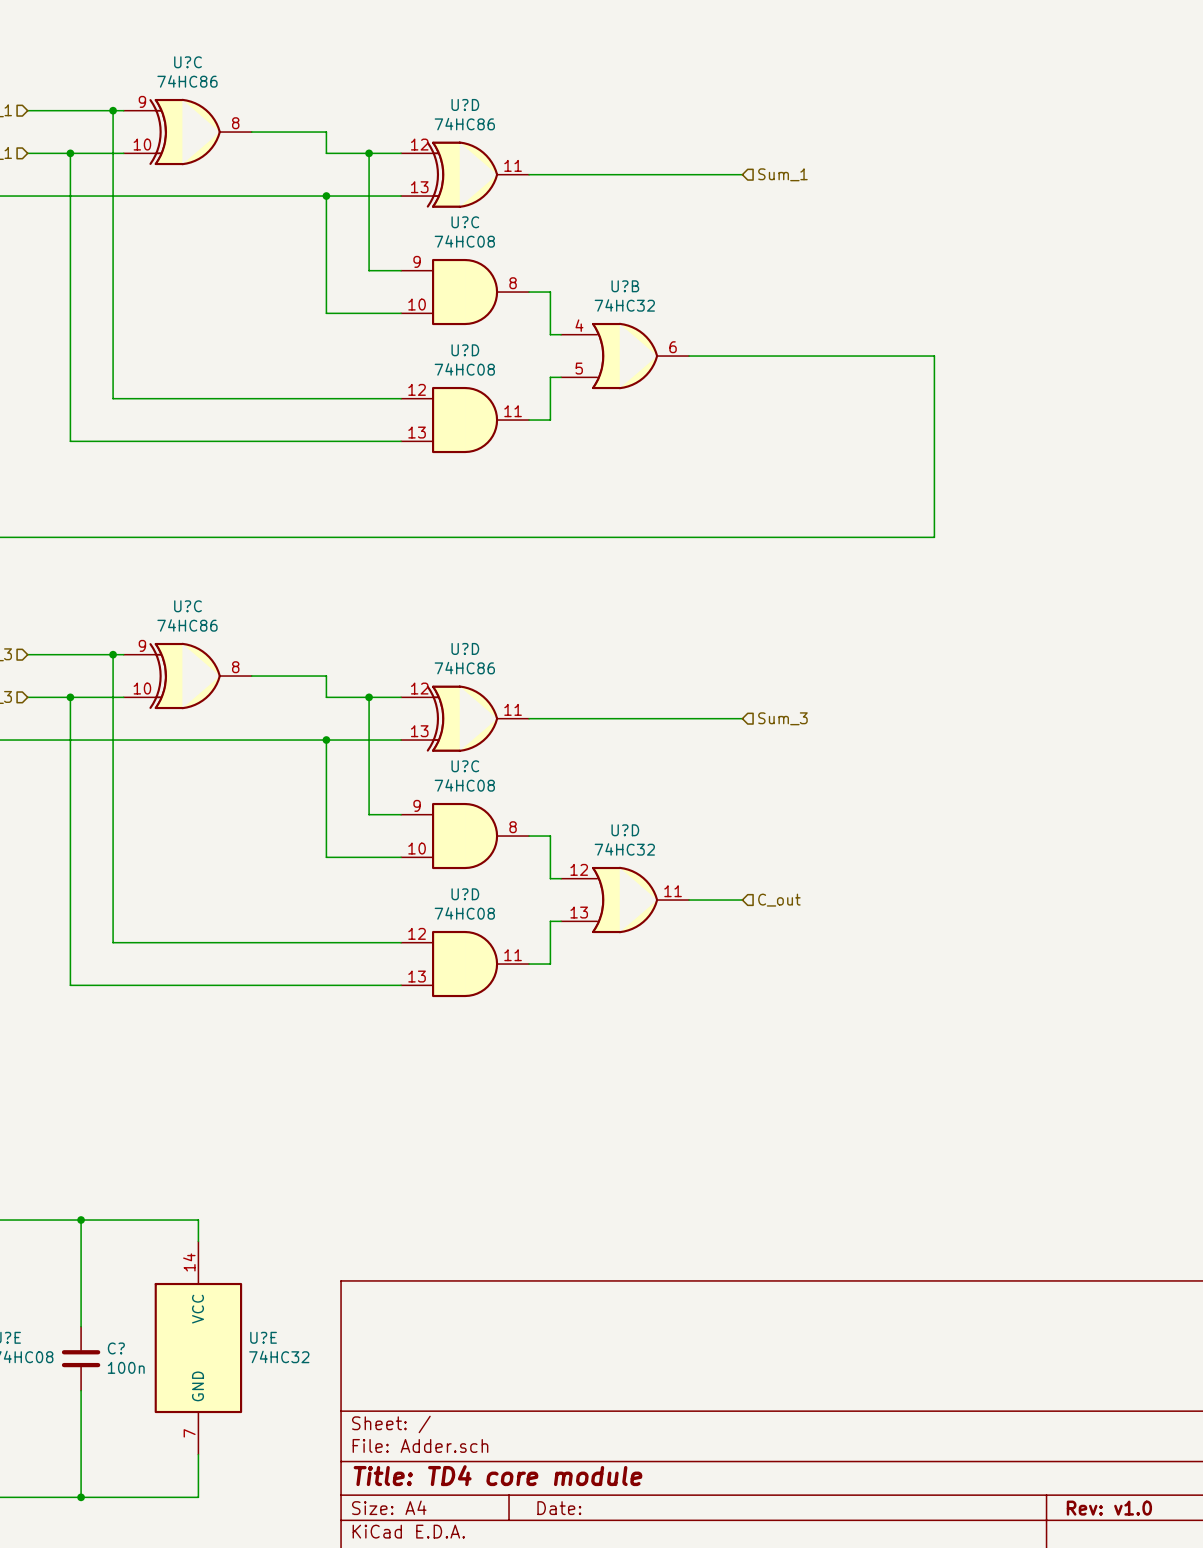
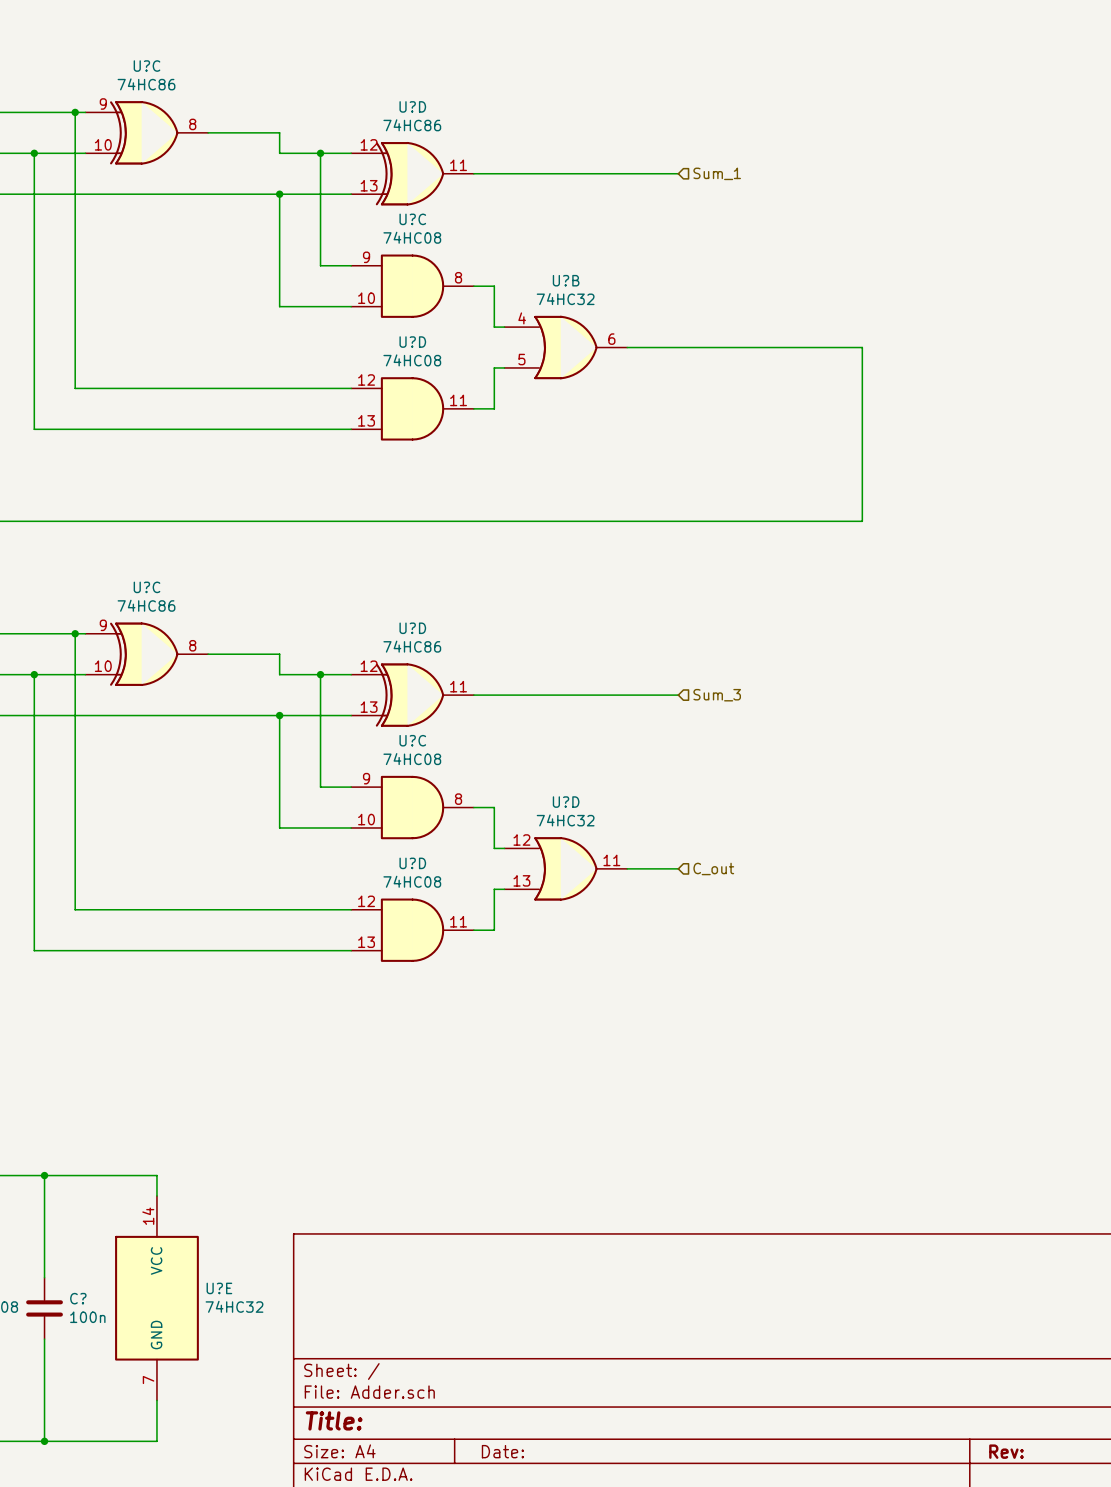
title block: Title: TD4 core module (498, 1475) -> Title: (334, 1420)
title block: Rev: v1.0 (1109, 1508) -> Rev: (1006, 1451)

